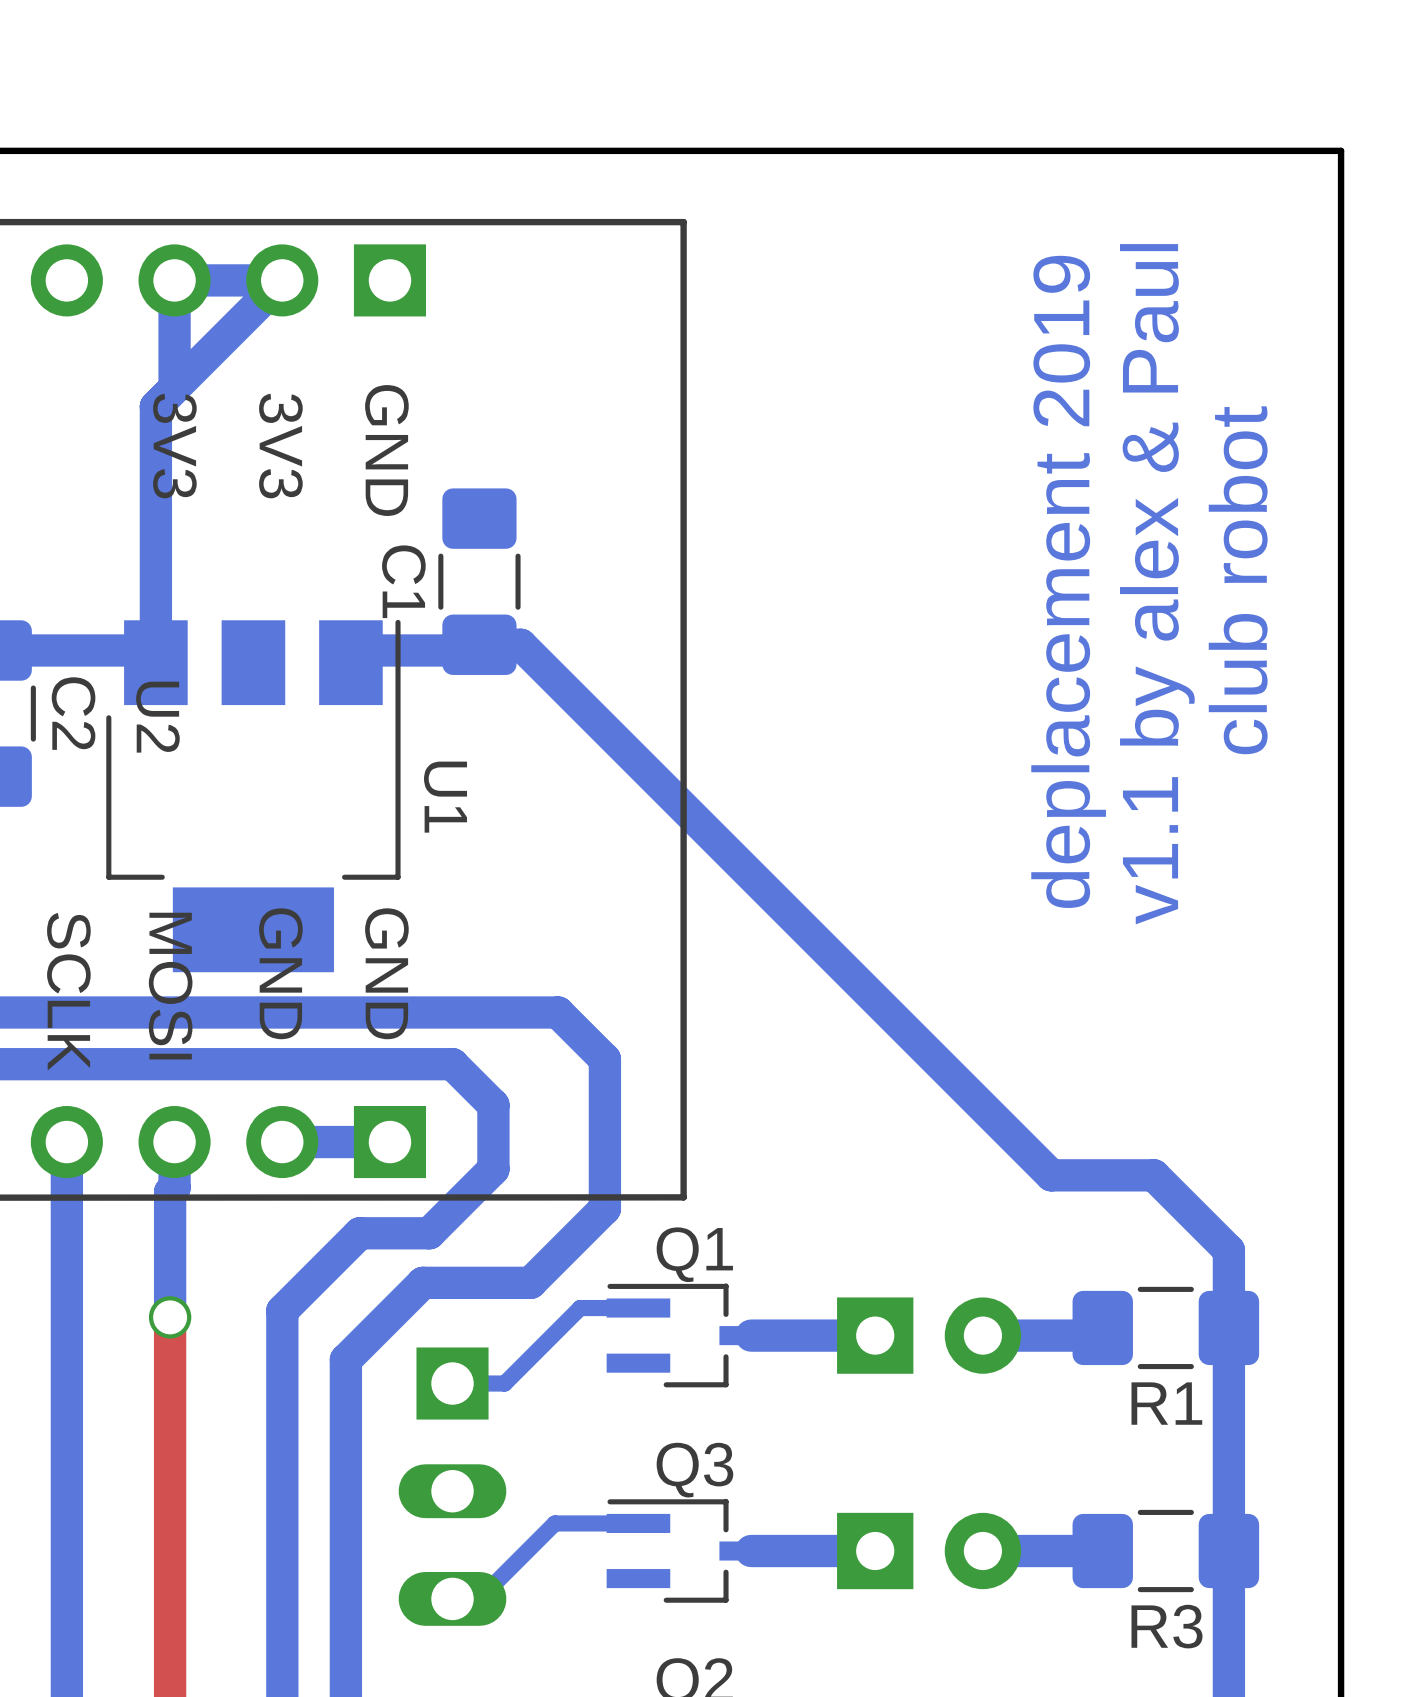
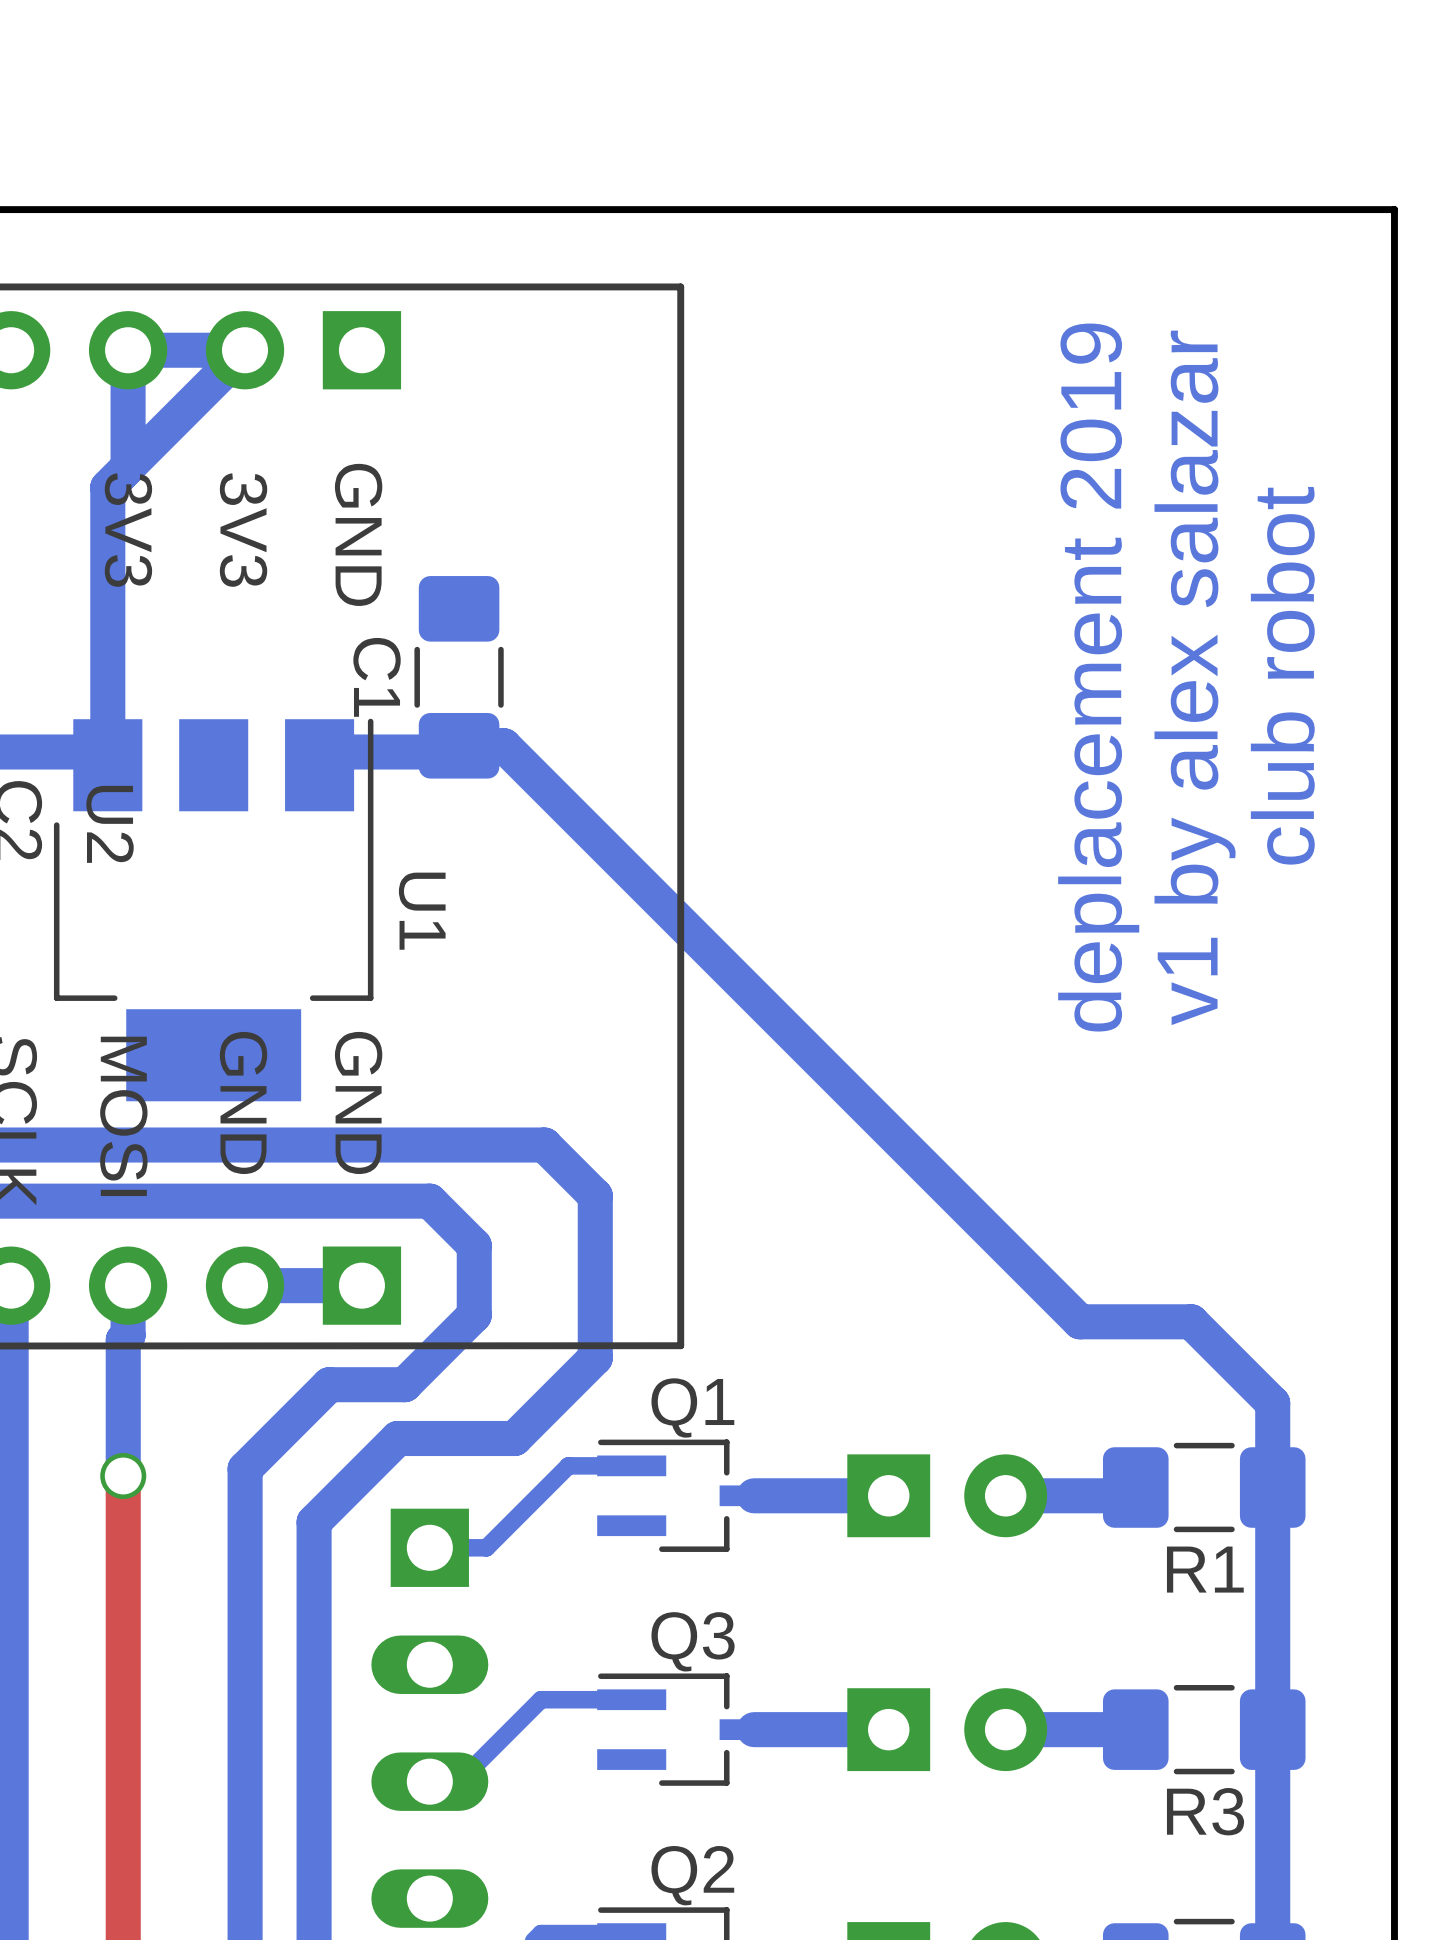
text: v1.1 by alex & Paul (1157, 584) -> v1 by alex salazar (1195, 677)

